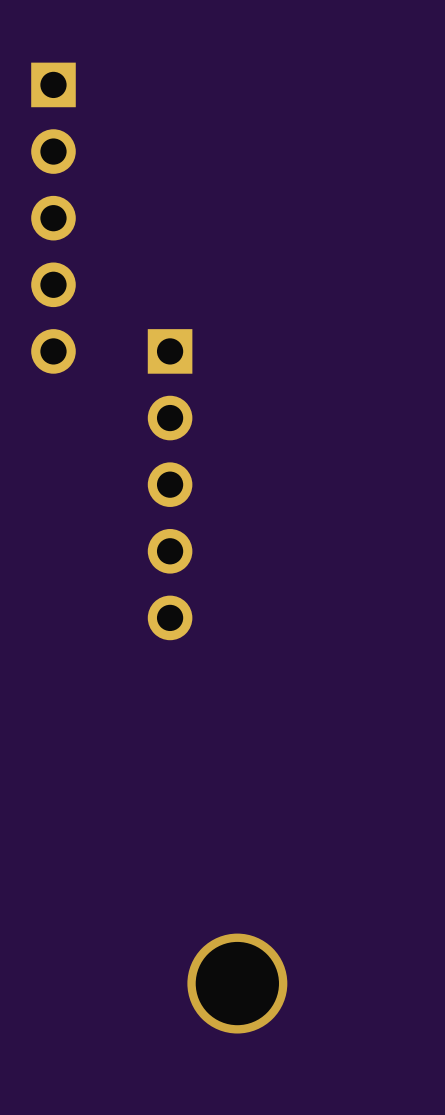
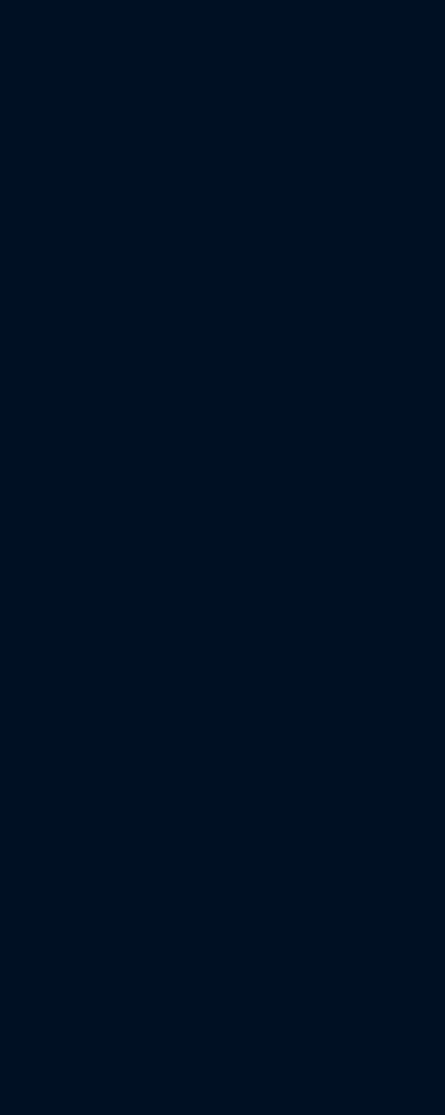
part: (53, 218) -> none
part: (170, 484) -> none
via: (237, 983) -> none

